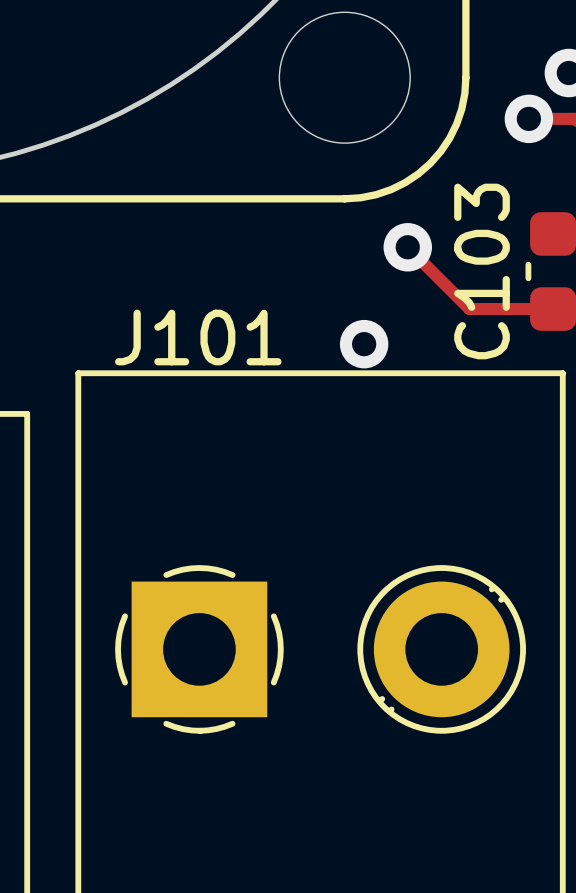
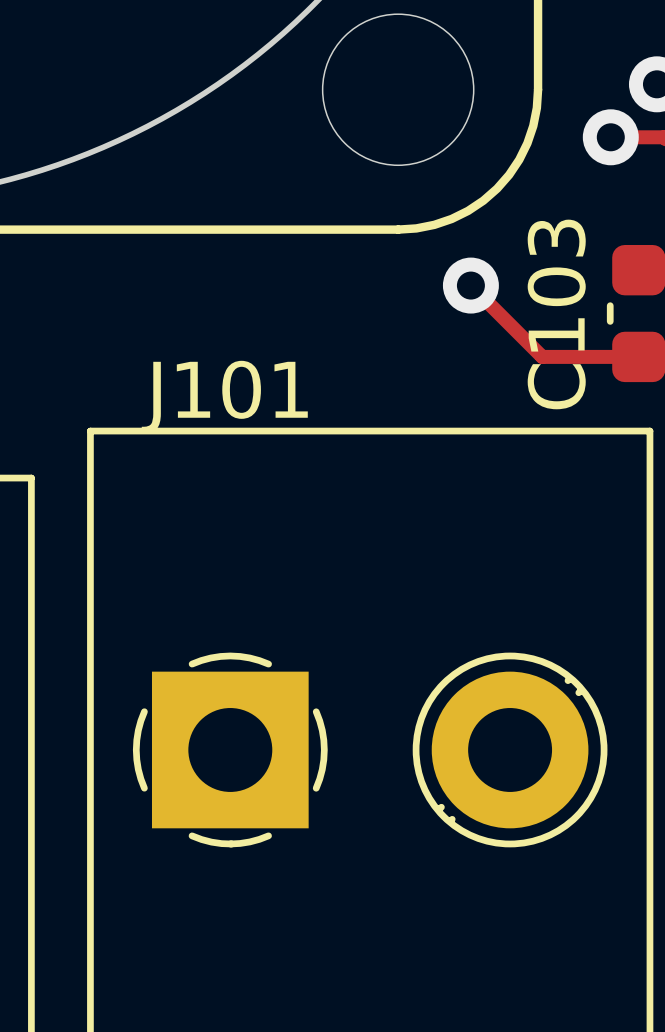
via: (364, 344) -> none

